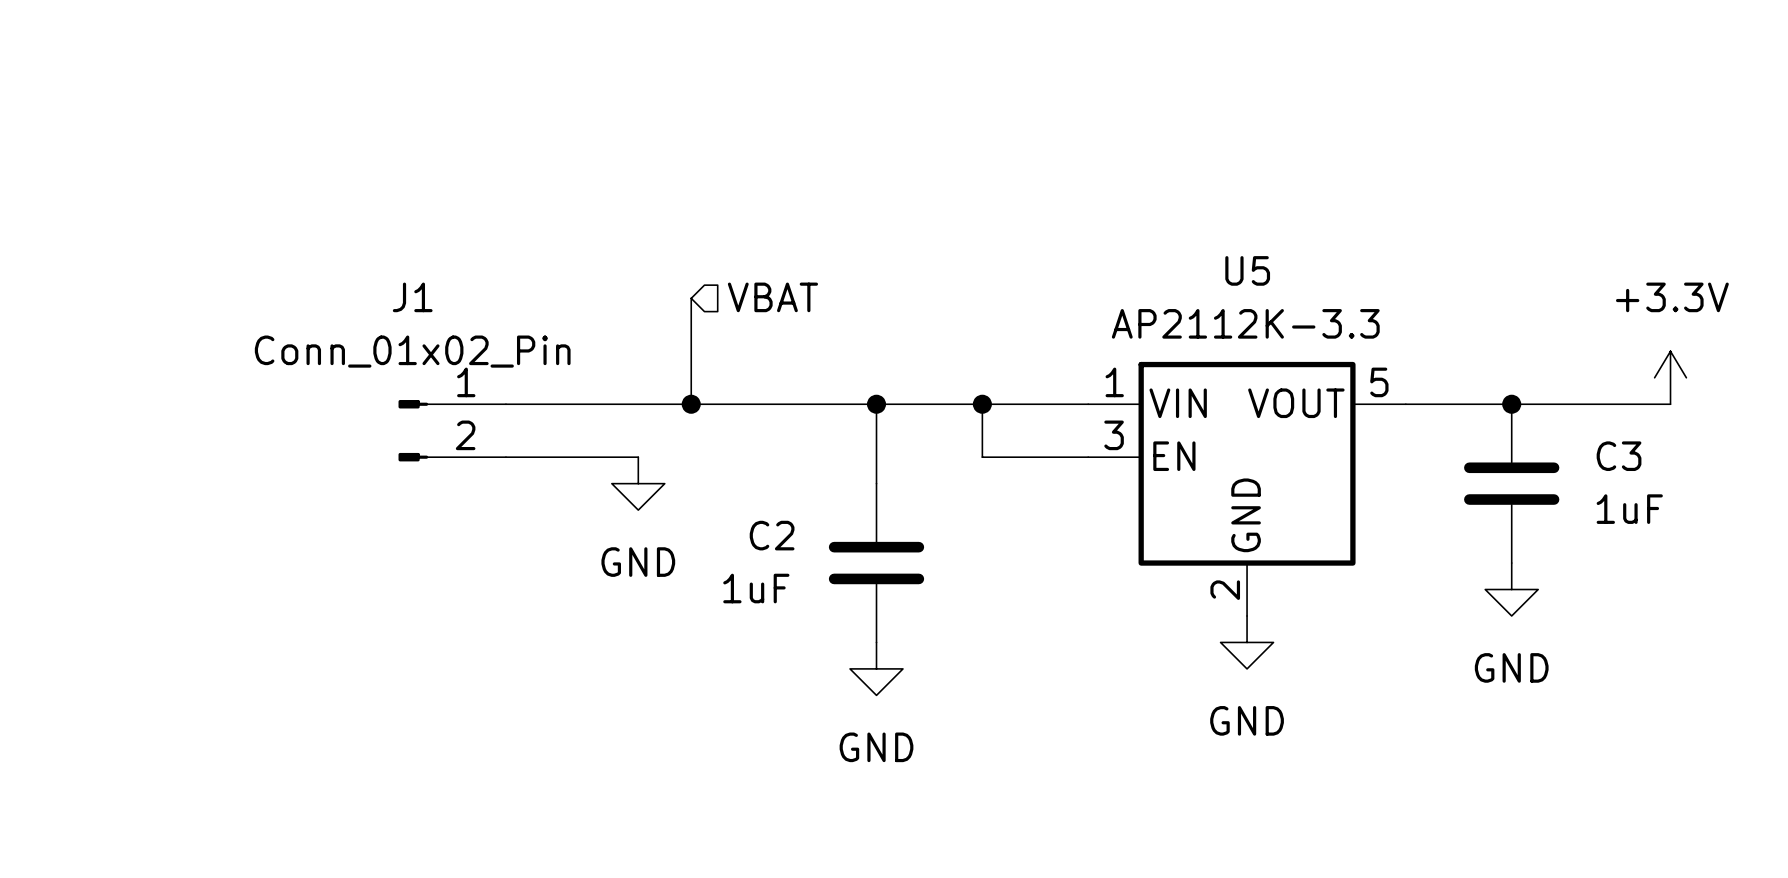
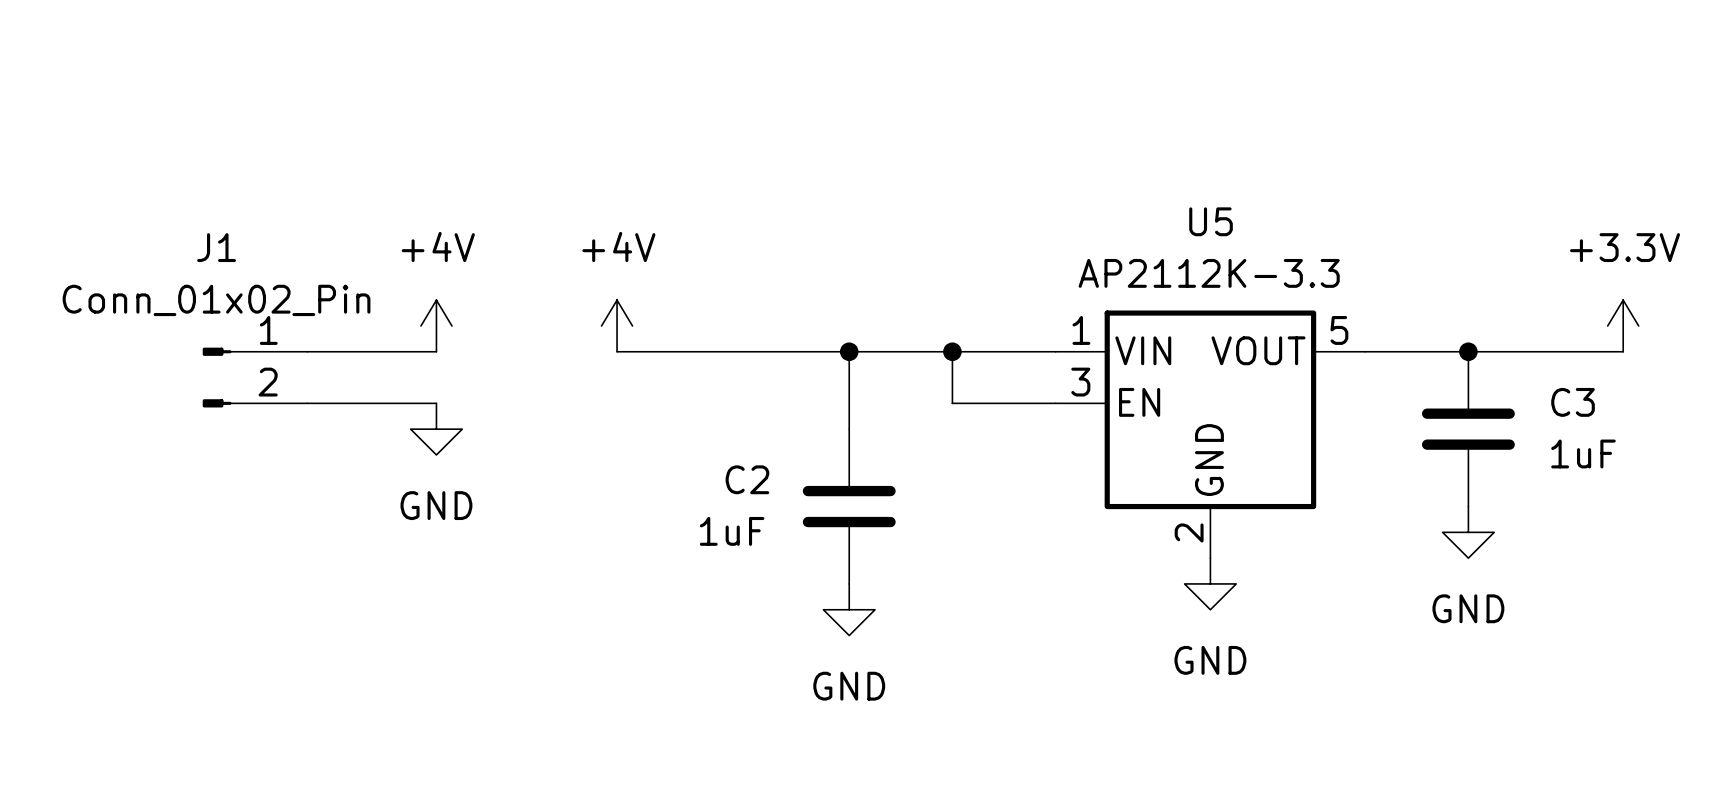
hierarchical label: VBAT (772, 297) -> none
wire: (691, 298) (691, 404) -> none
power symbol: none -> +4V (436, 325)
power symbol: none -> +4V (617, 325)
wire: (505, 404) (638, 404) -> (307, 351) (436, 351)
junction: (691, 404) -> none
J1 position: (452, 430) -> (255, 377)
wire: (505, 457) (638, 457) -> (307, 403) (436, 403)
power symbol position: GND (638, 483) -> GND (436, 429)

